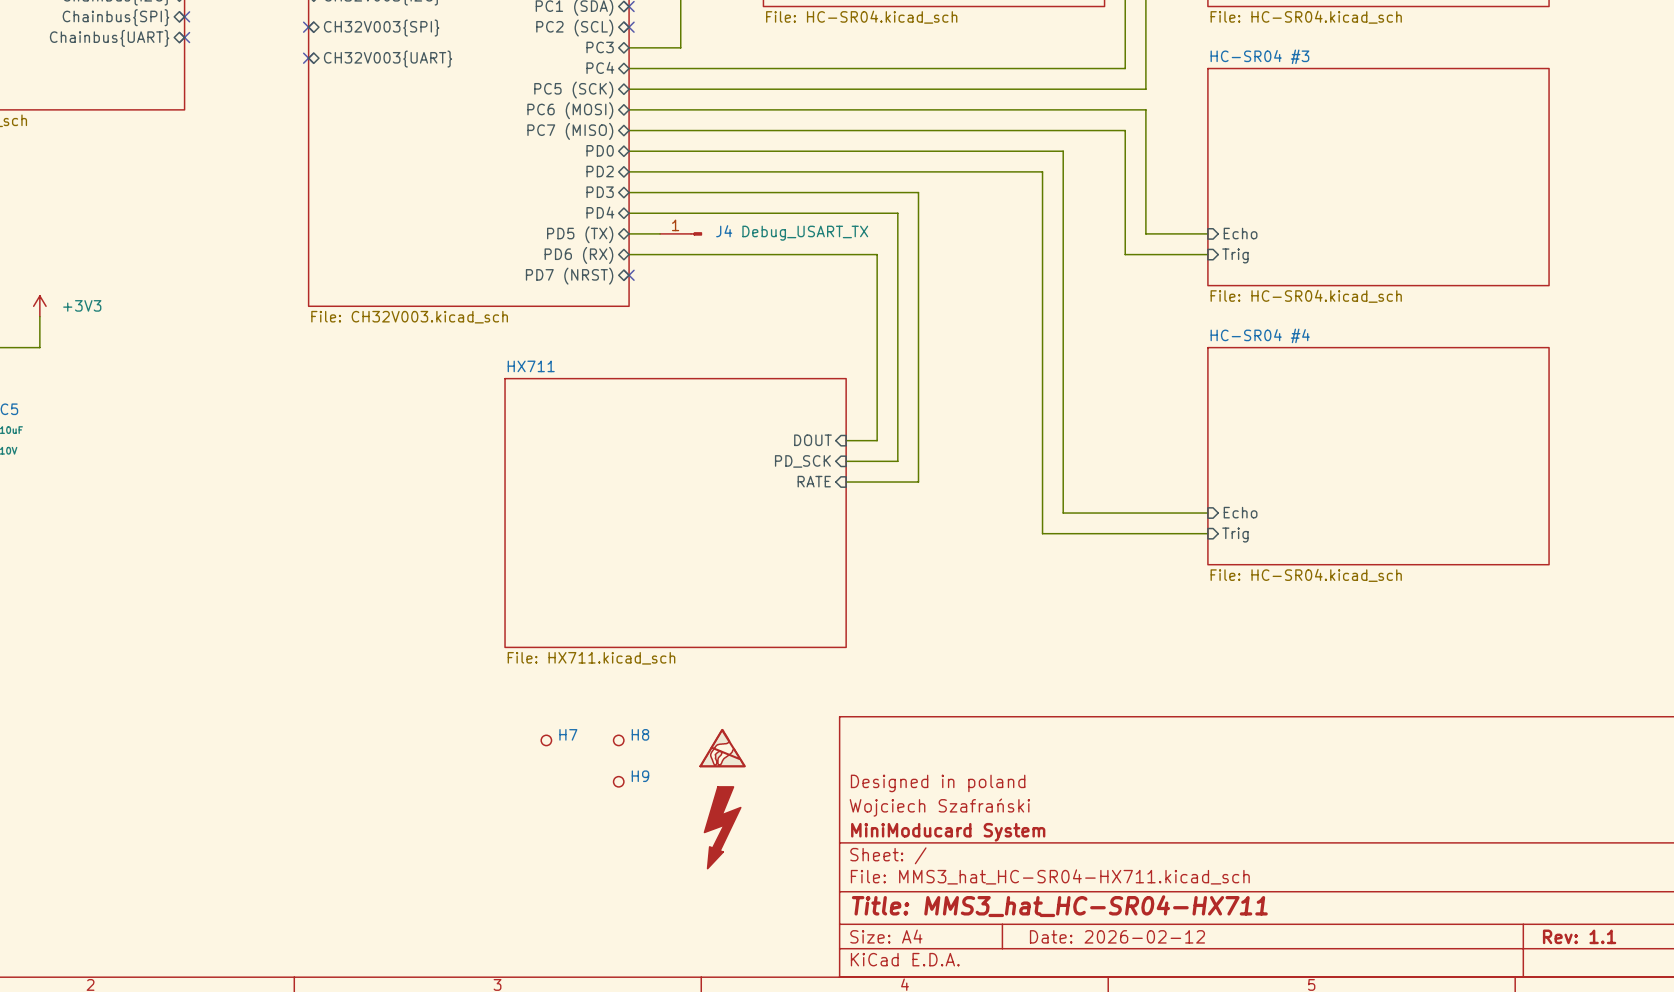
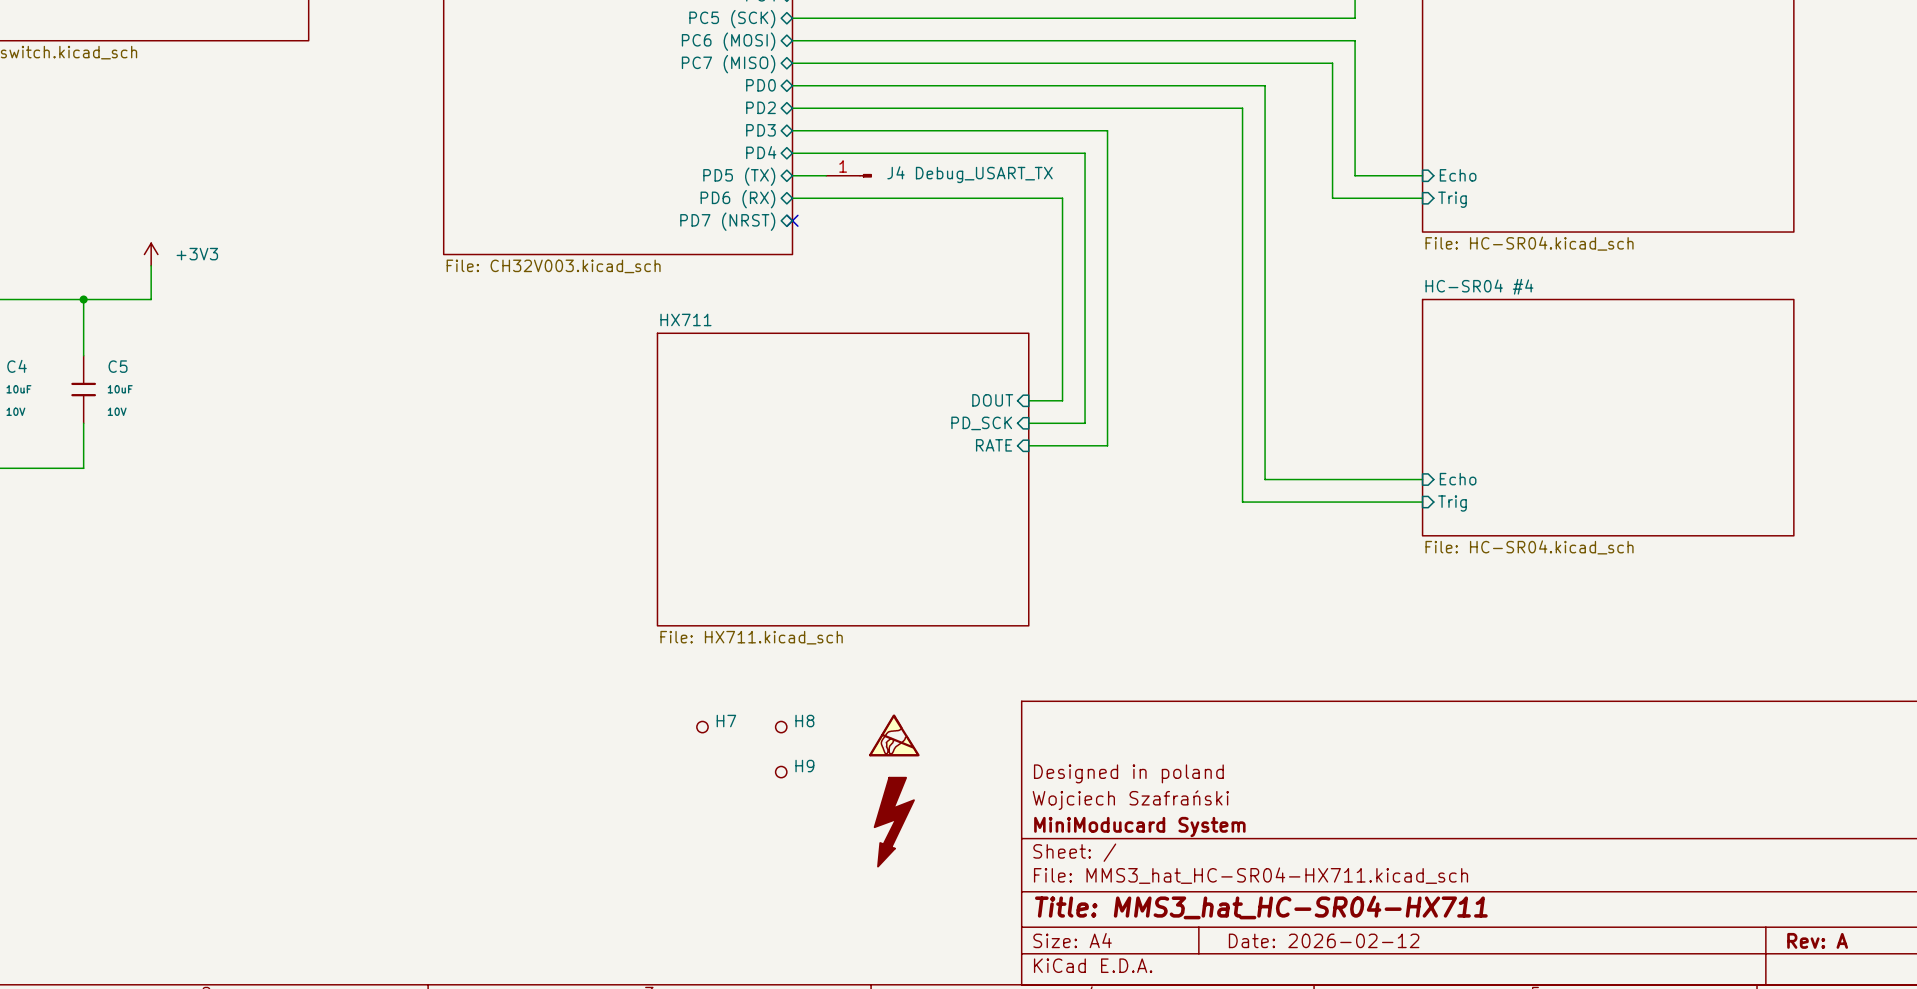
title block: Rev: 1.1 (1579, 936) -> Rev: A (1817, 940)

